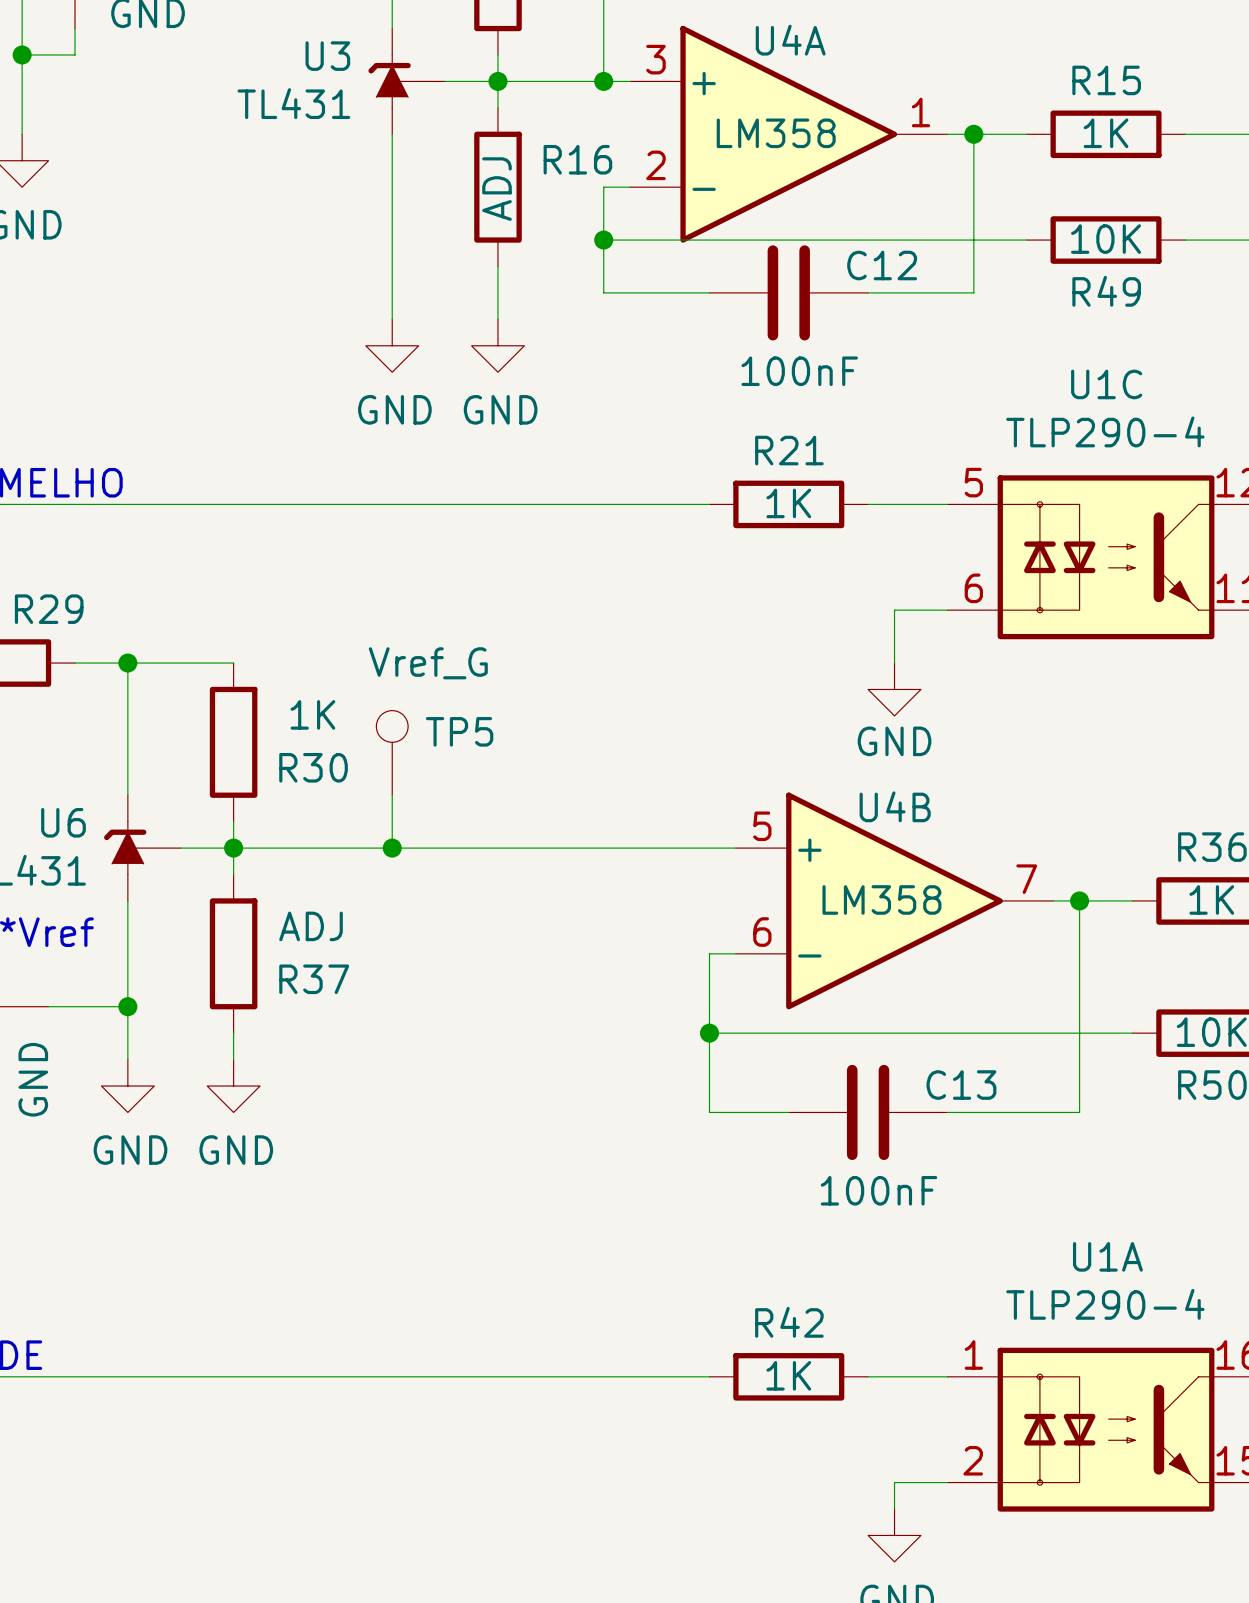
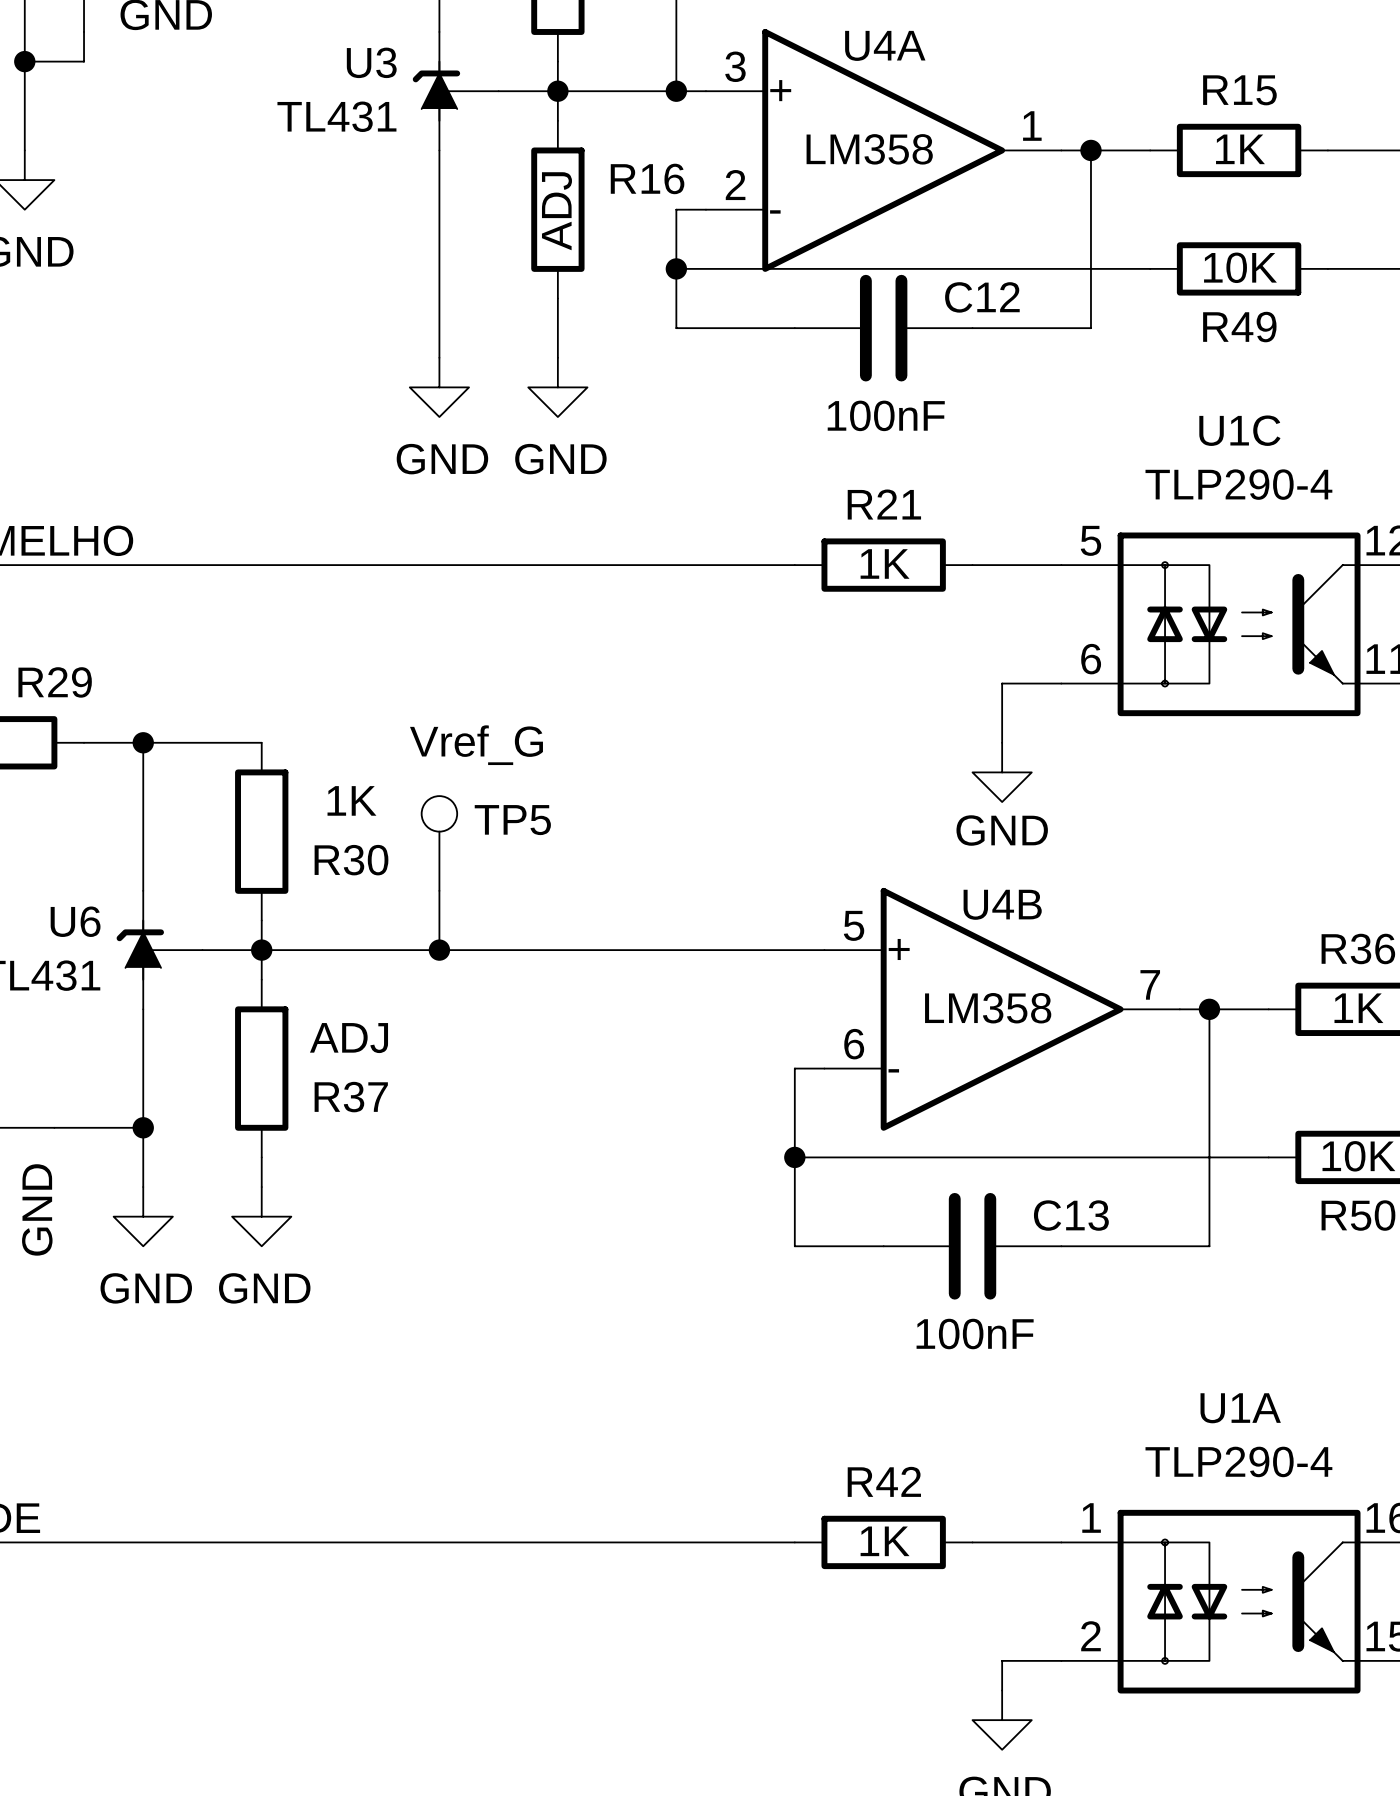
U3 symbol: [368, 28, 446, 135] -> [412, 31, 499, 151]
U6 symbol: [104, 795, 181, 901] -> [116, 890, 203, 1010]

